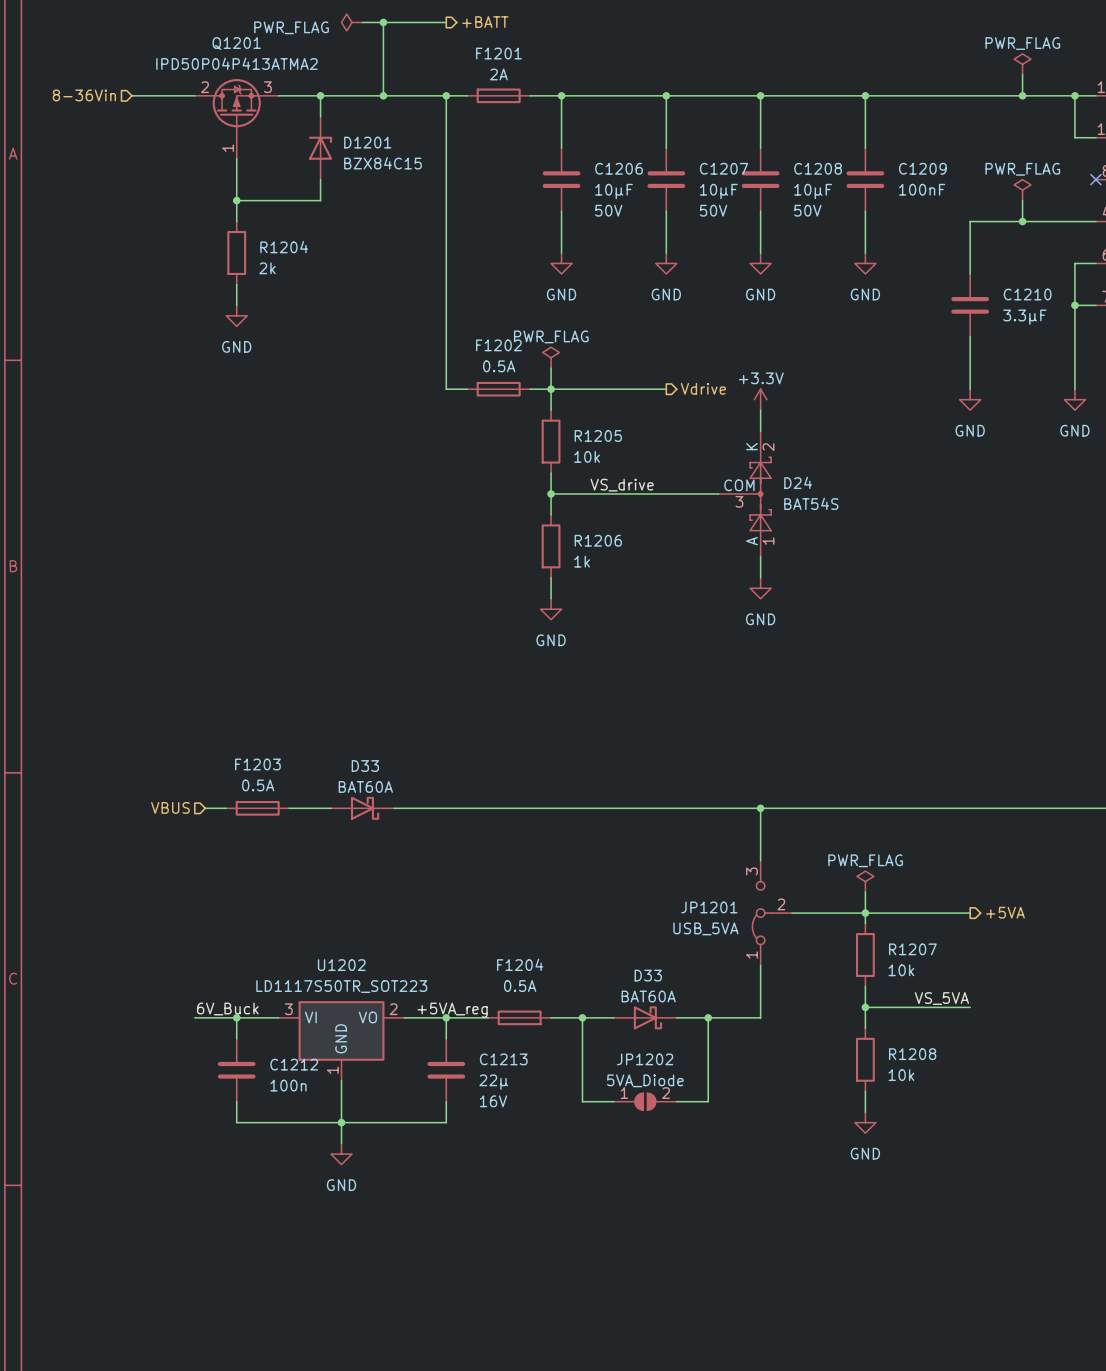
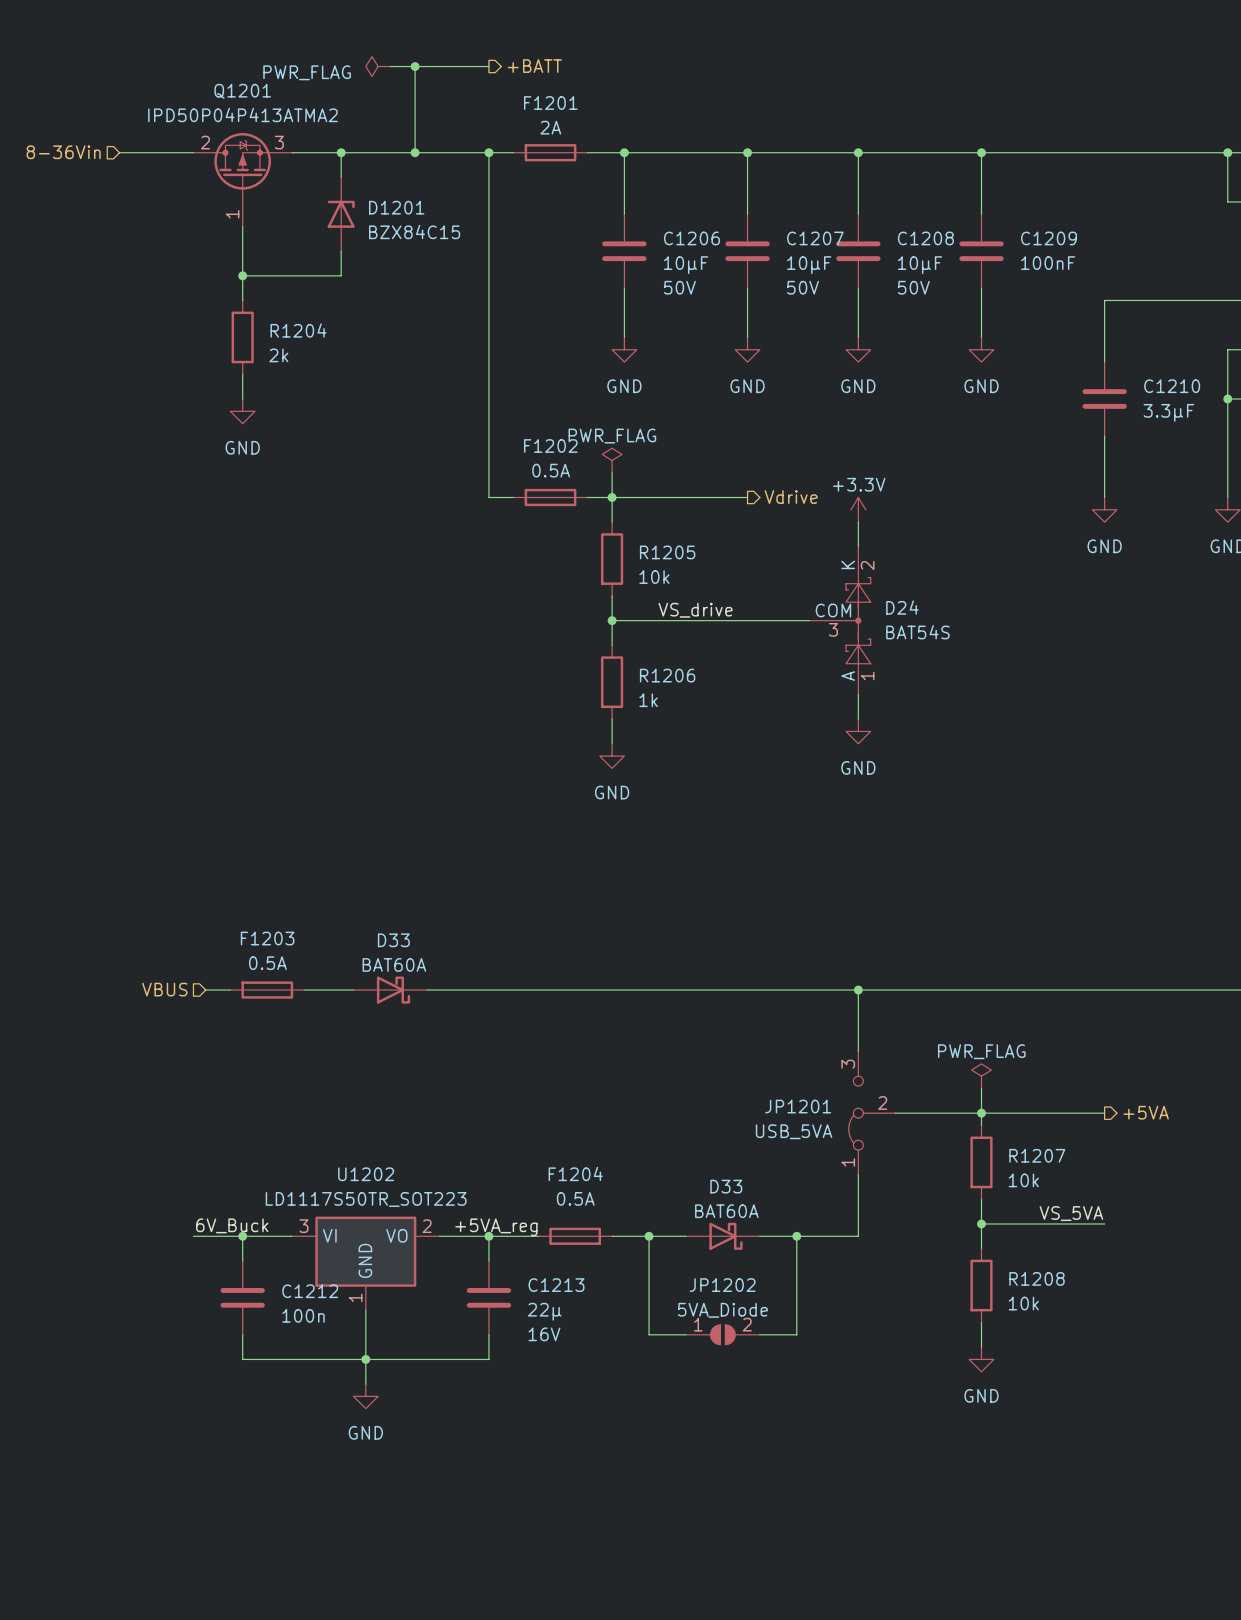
power symbol: PWR_FLAG (1022, 64) -> none
wire: (1022, 74) (1022, 95) -> none
junction: (1022, 95) -> none
power symbol: PWR_FLAG (1022, 190) -> none
wire: (1022, 200) (1022, 221) -> none
junction: (1022, 221) -> none

